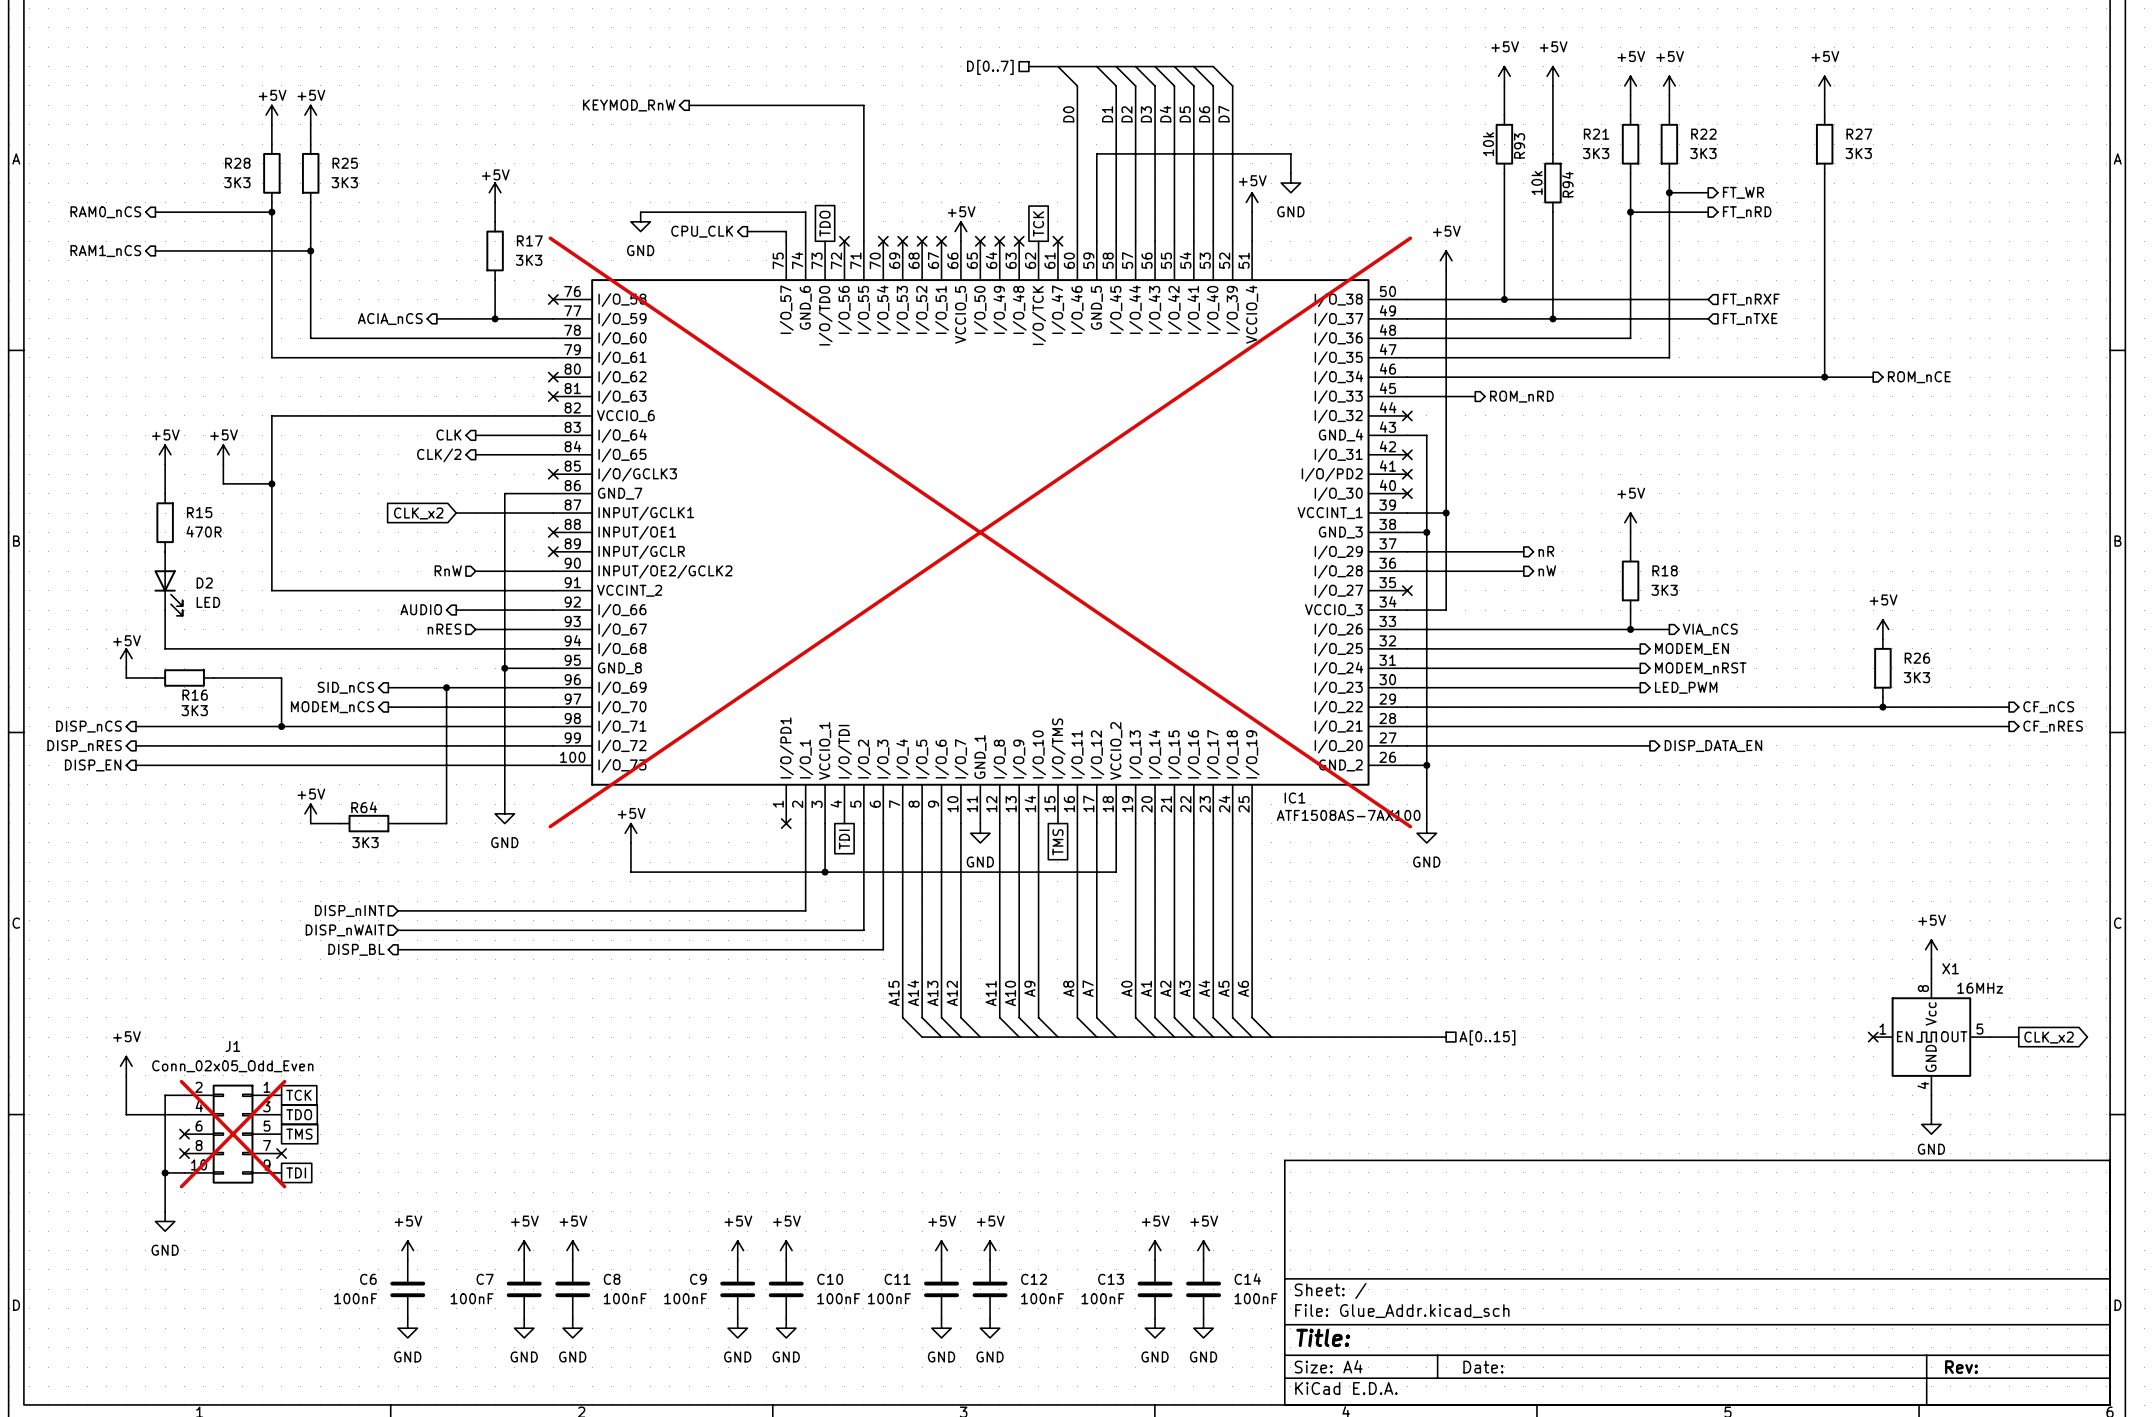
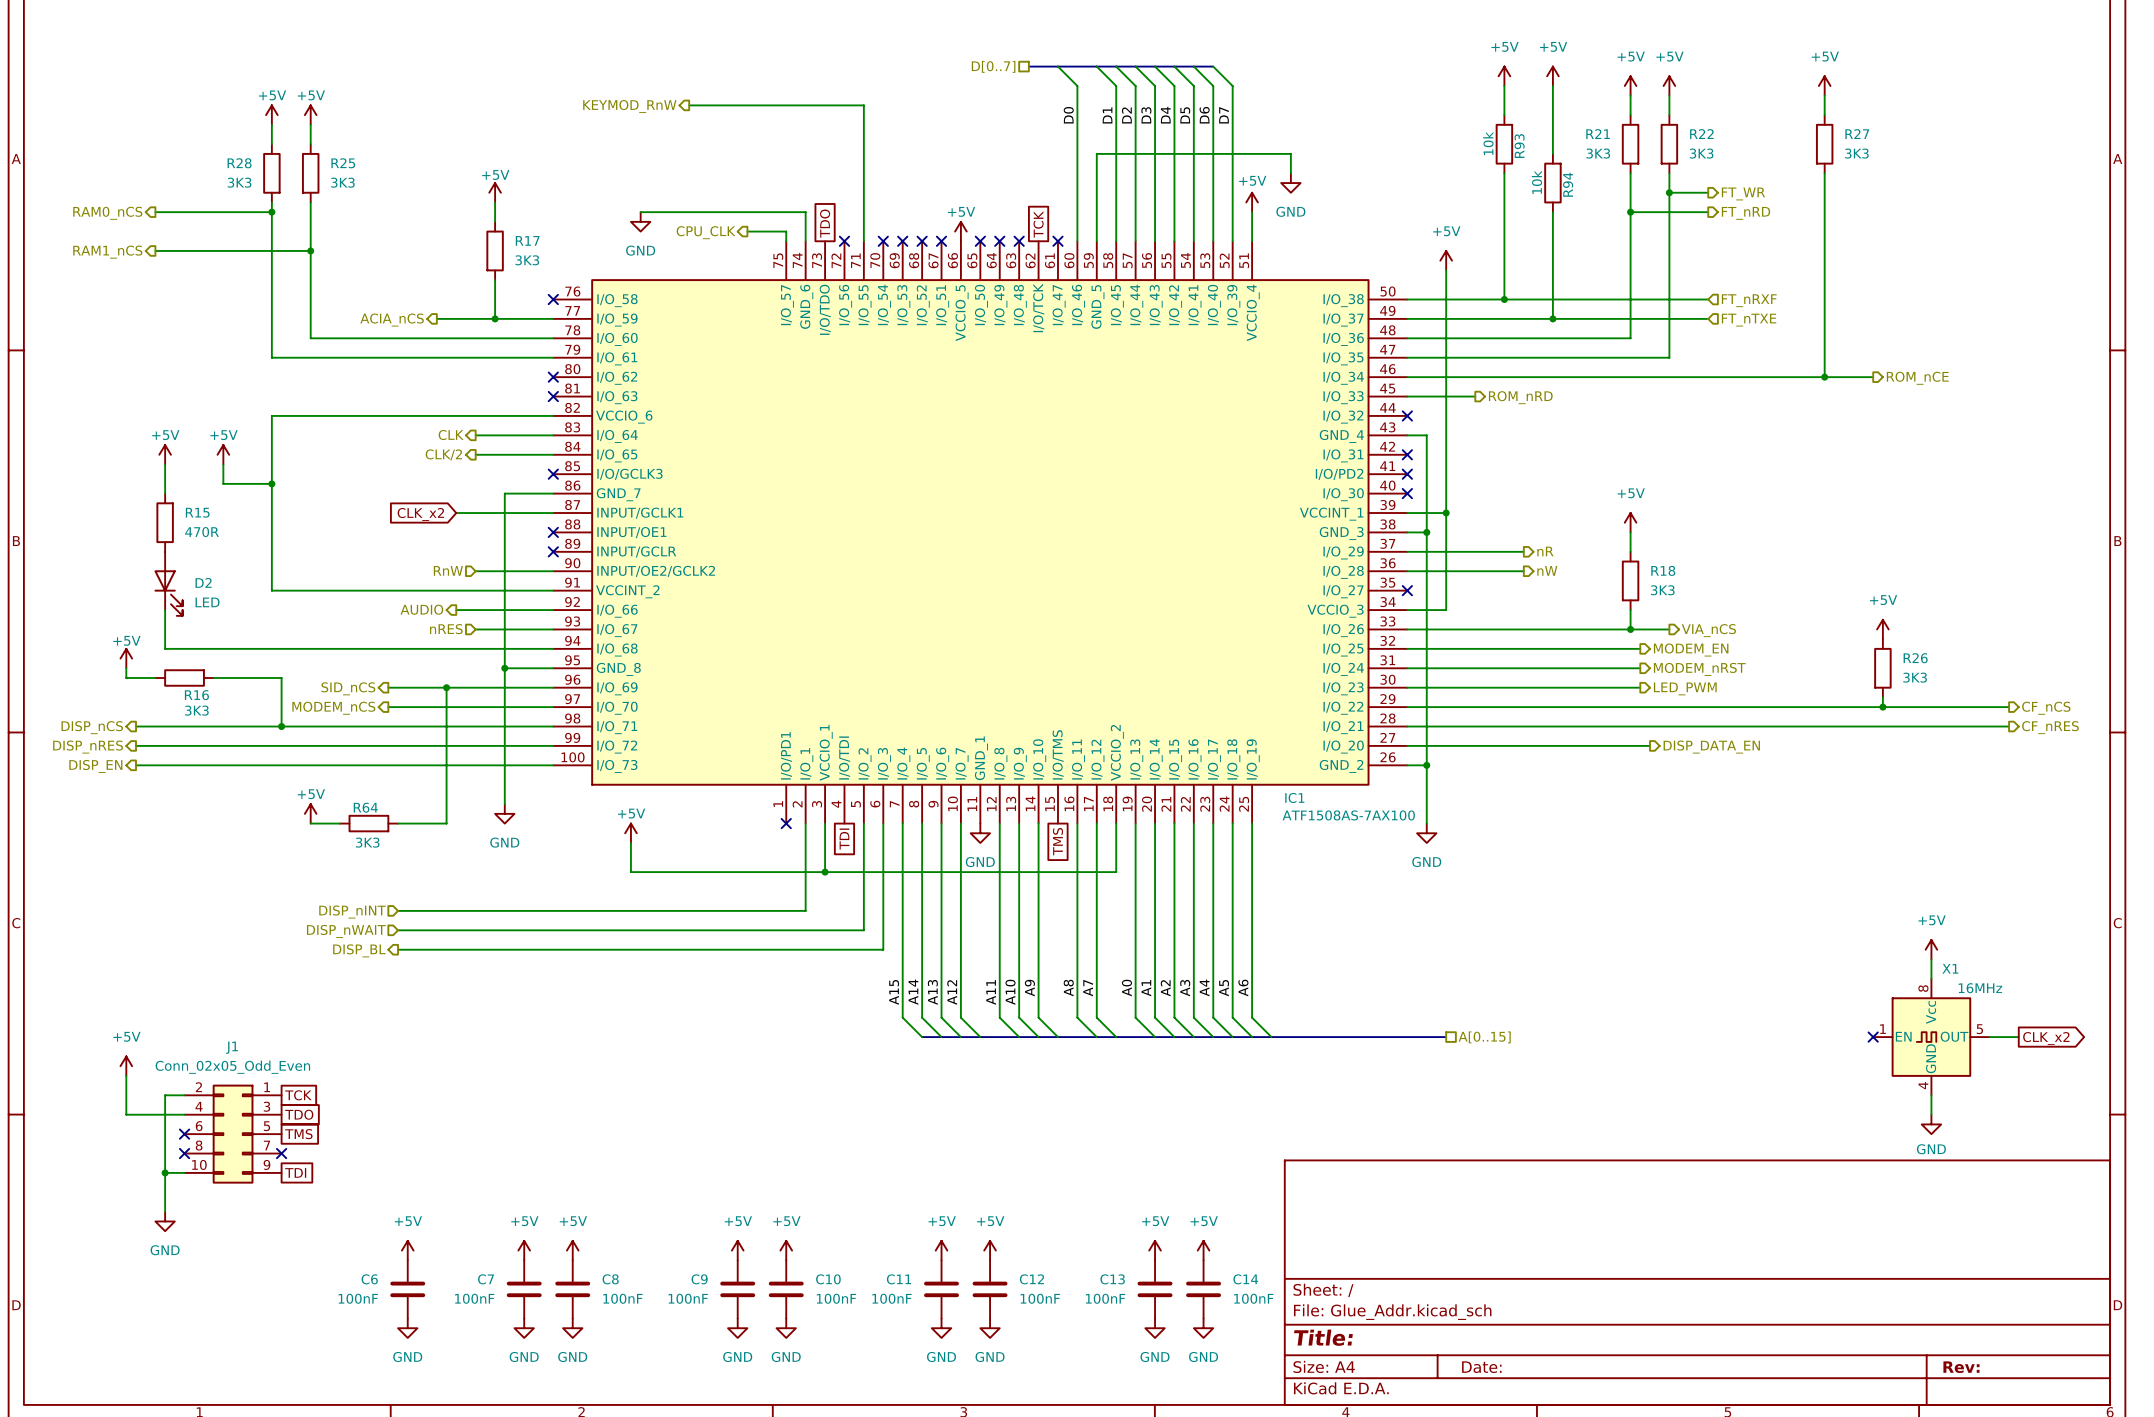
IC1 do-not-place cross: (980, 532) -> none
J1 do-not-place cross: (233, 1134) -> none

